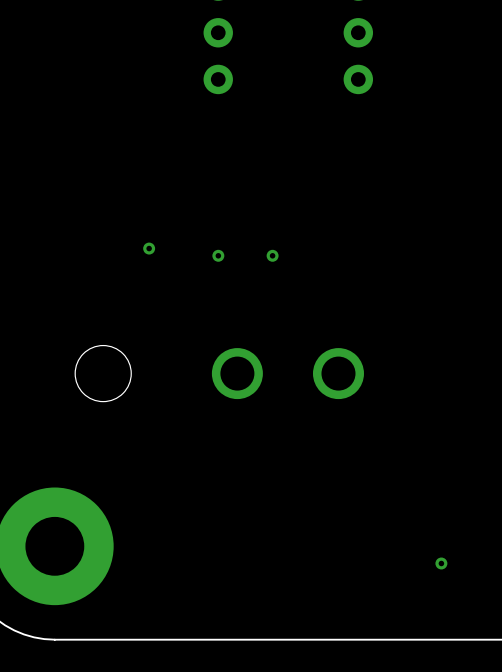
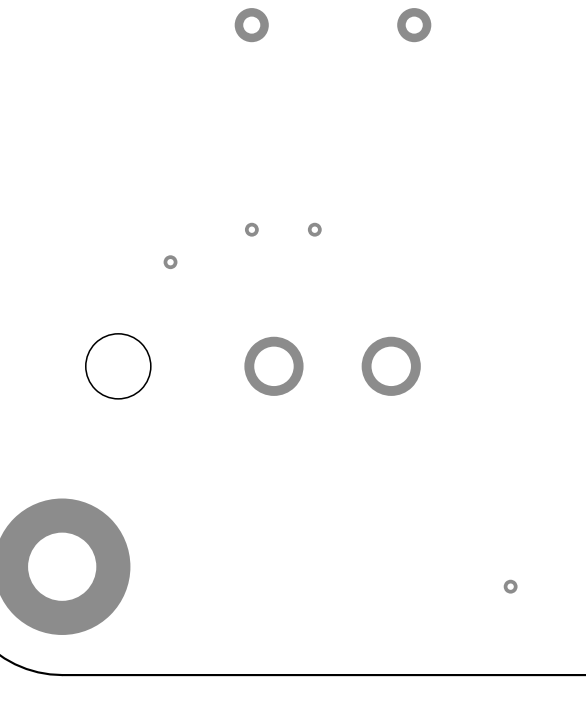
via position: (149, 248) -> (170, 262)

